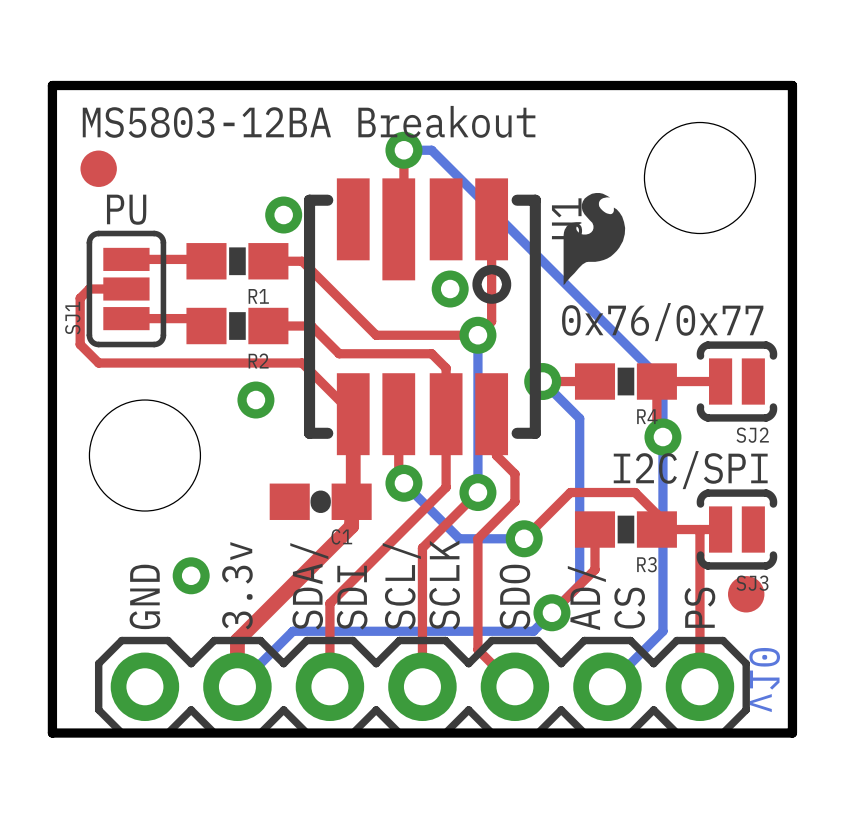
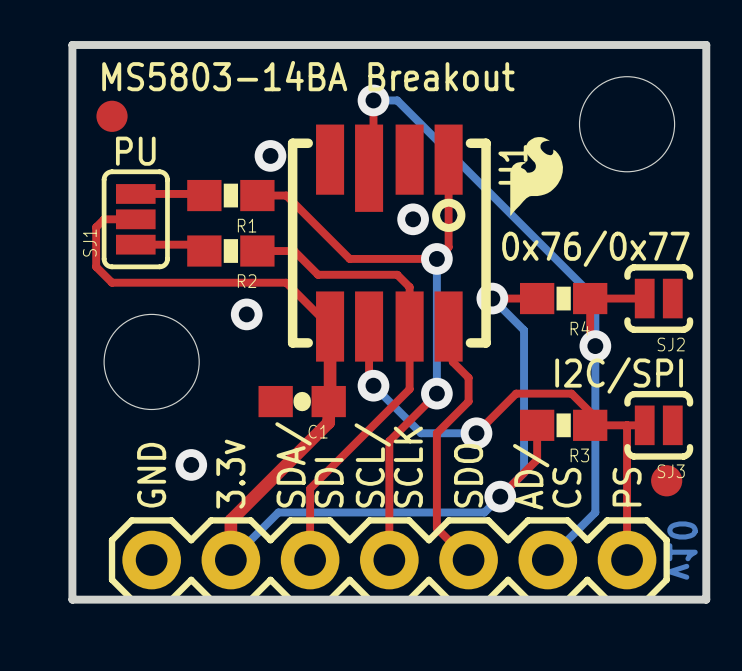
text: MS5803-12BA Breakout (309, 121) -> MS5803-14BA Breakout (308, 76)

